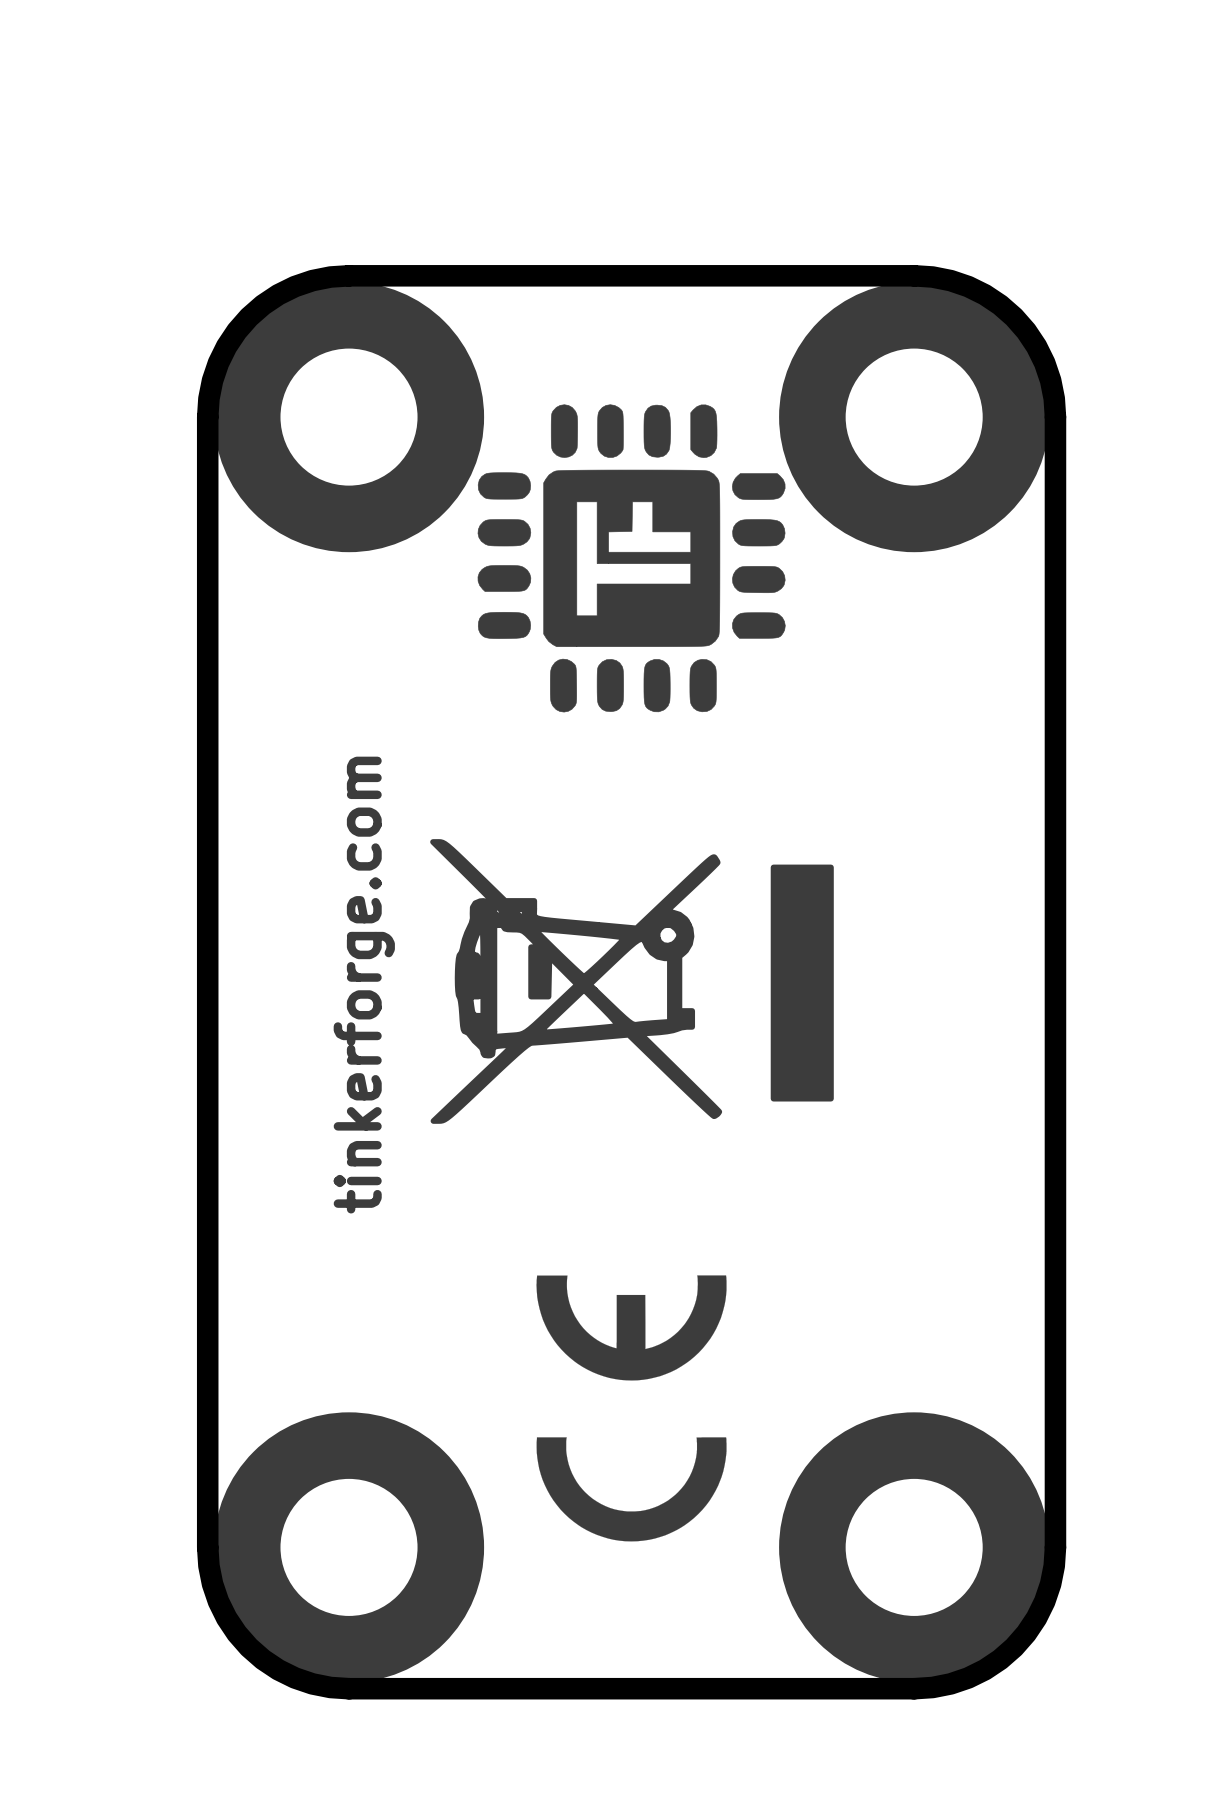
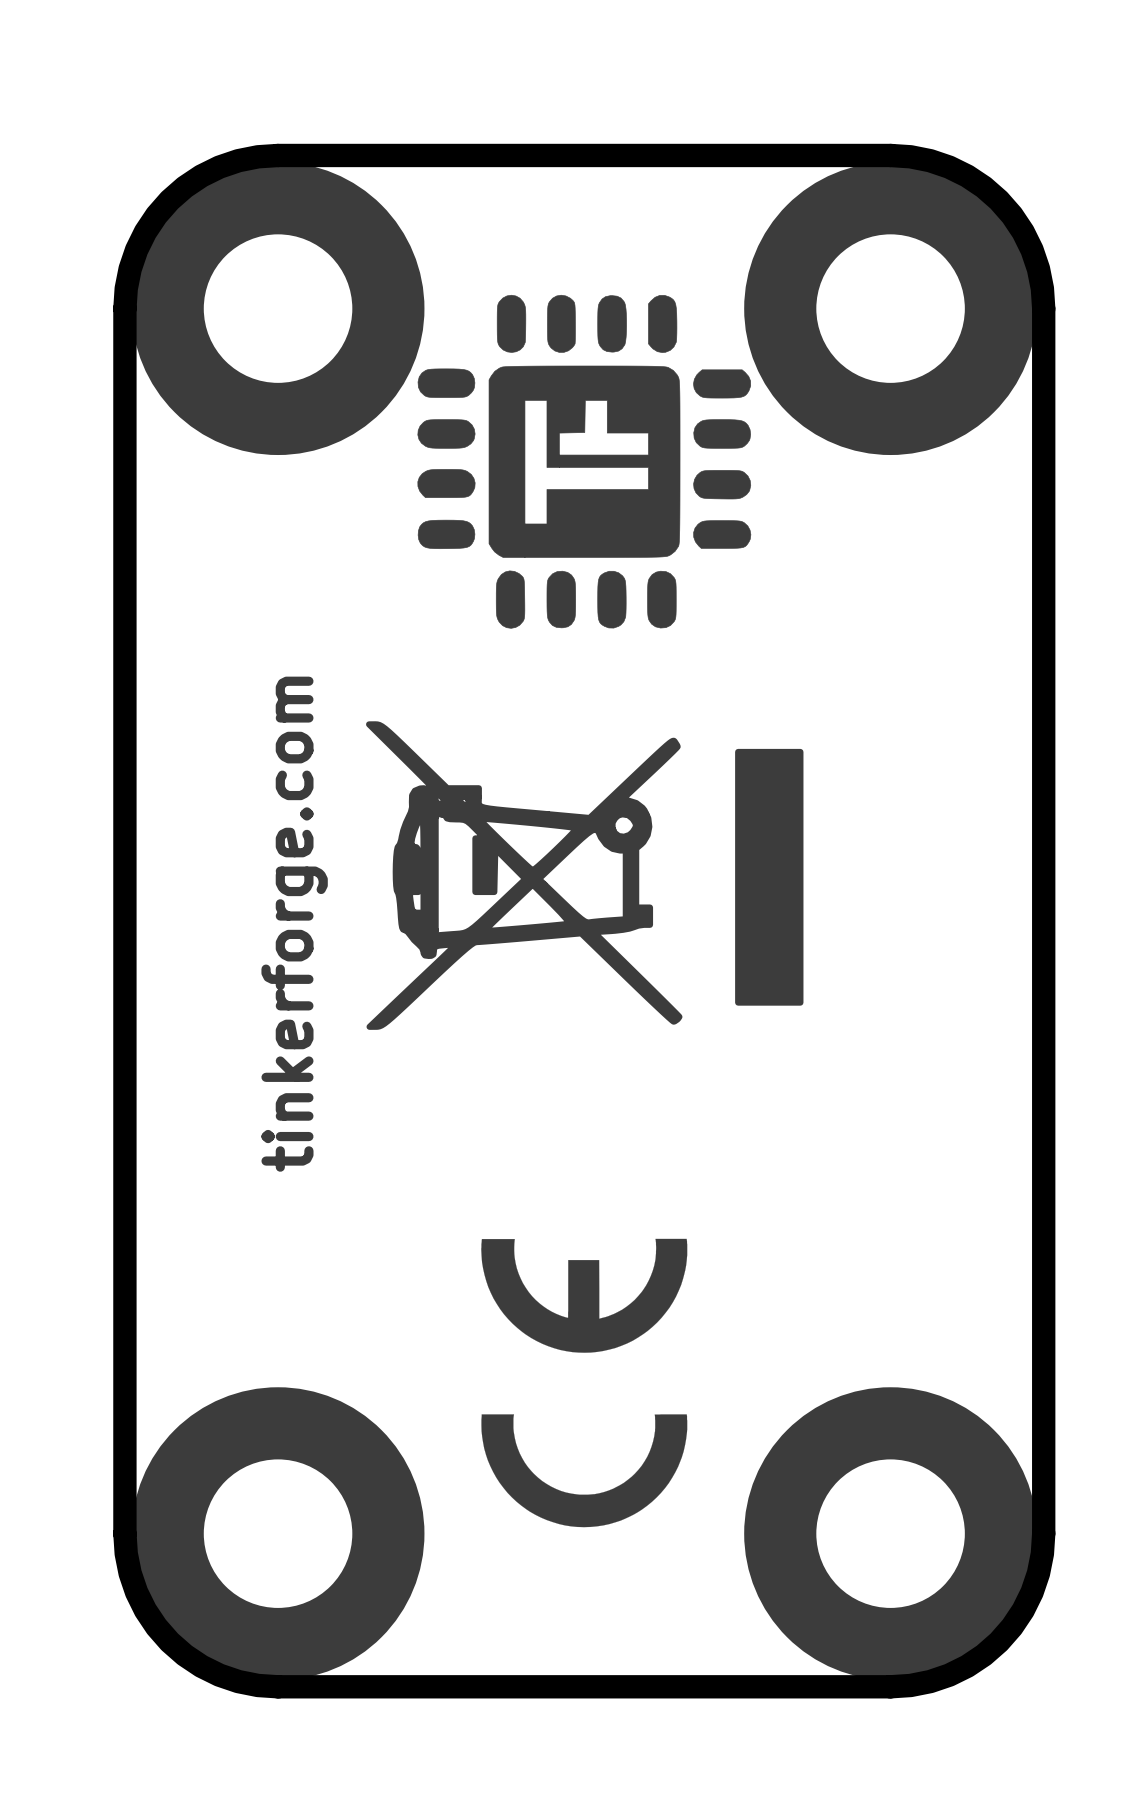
drawing position: (631, 981) -> (584, 875)

